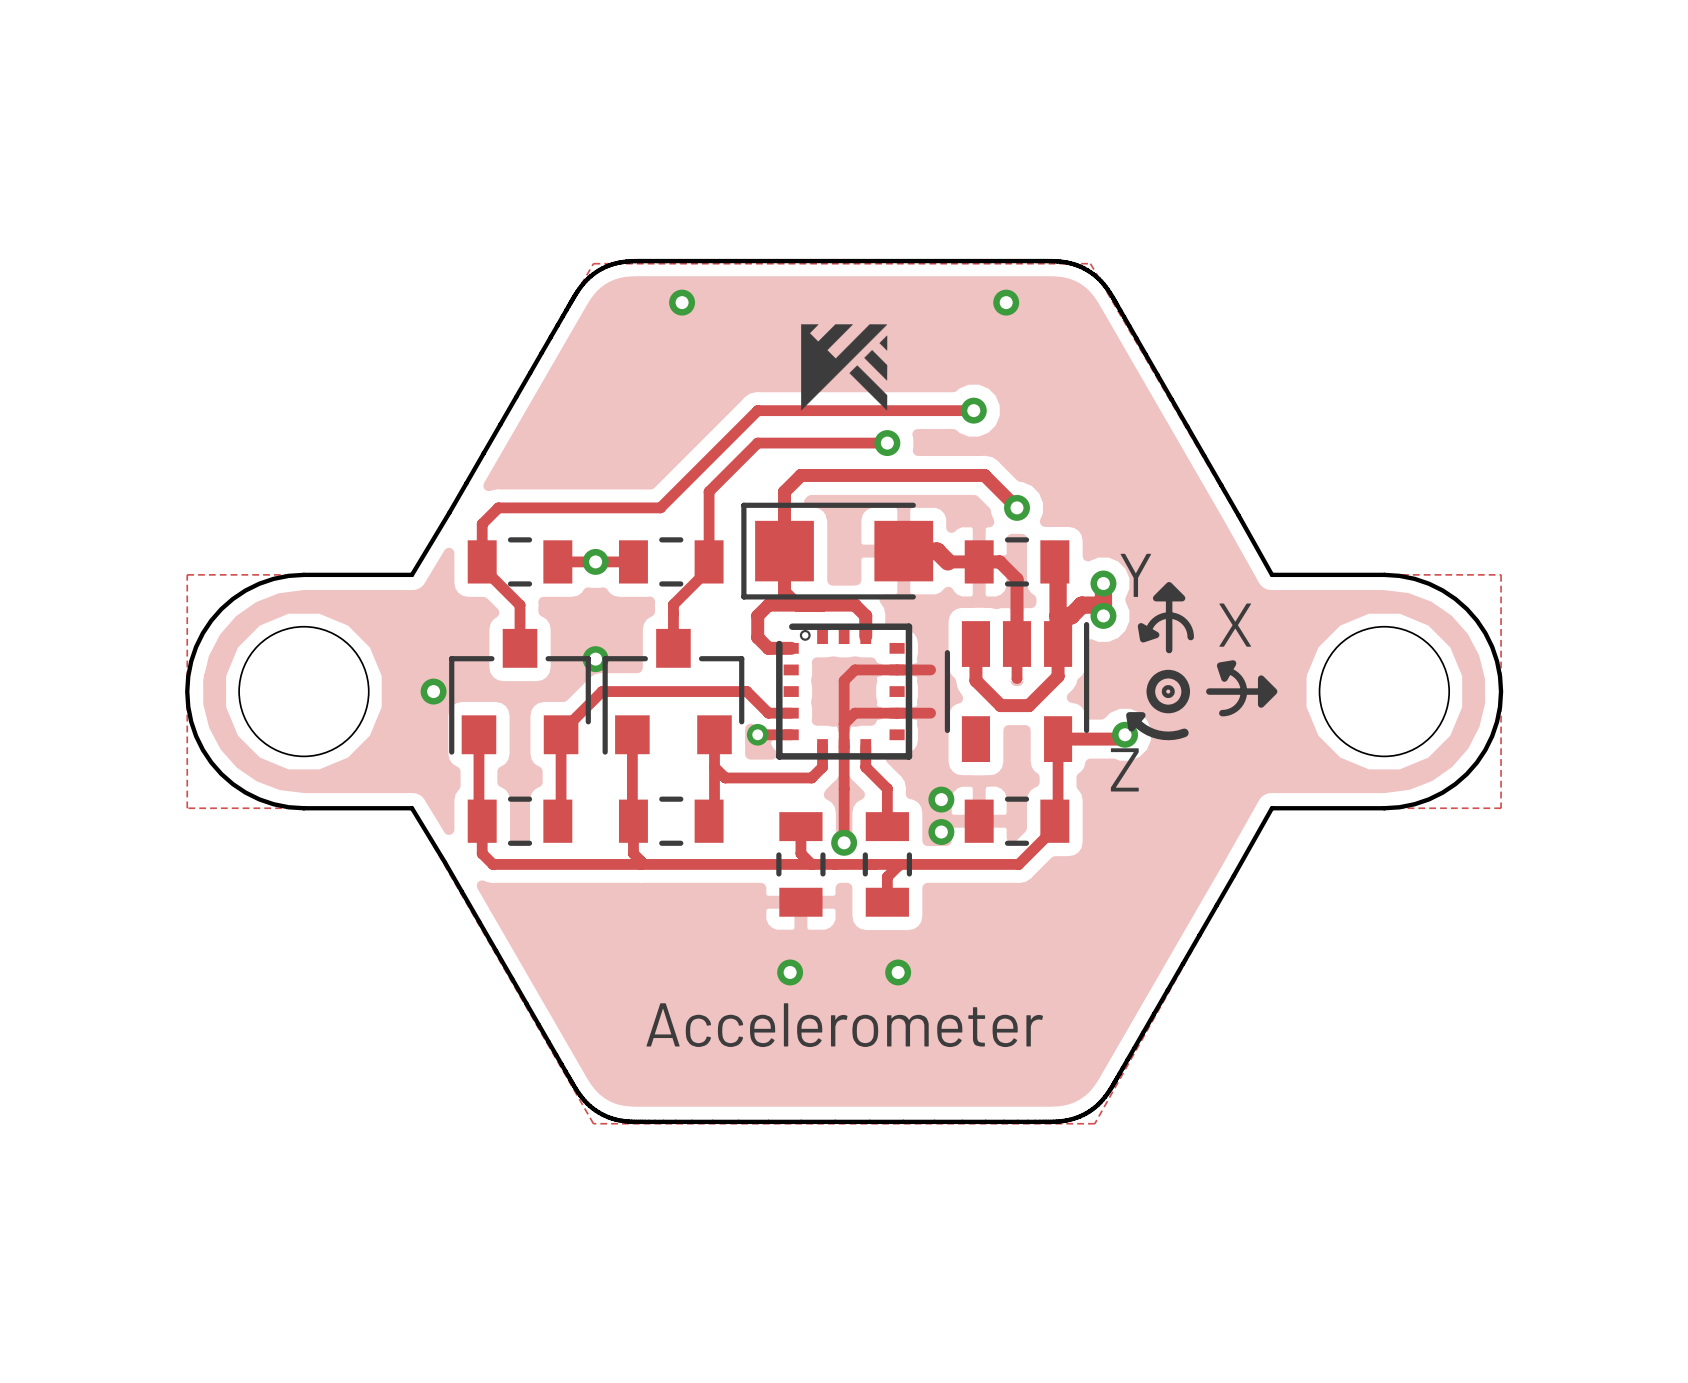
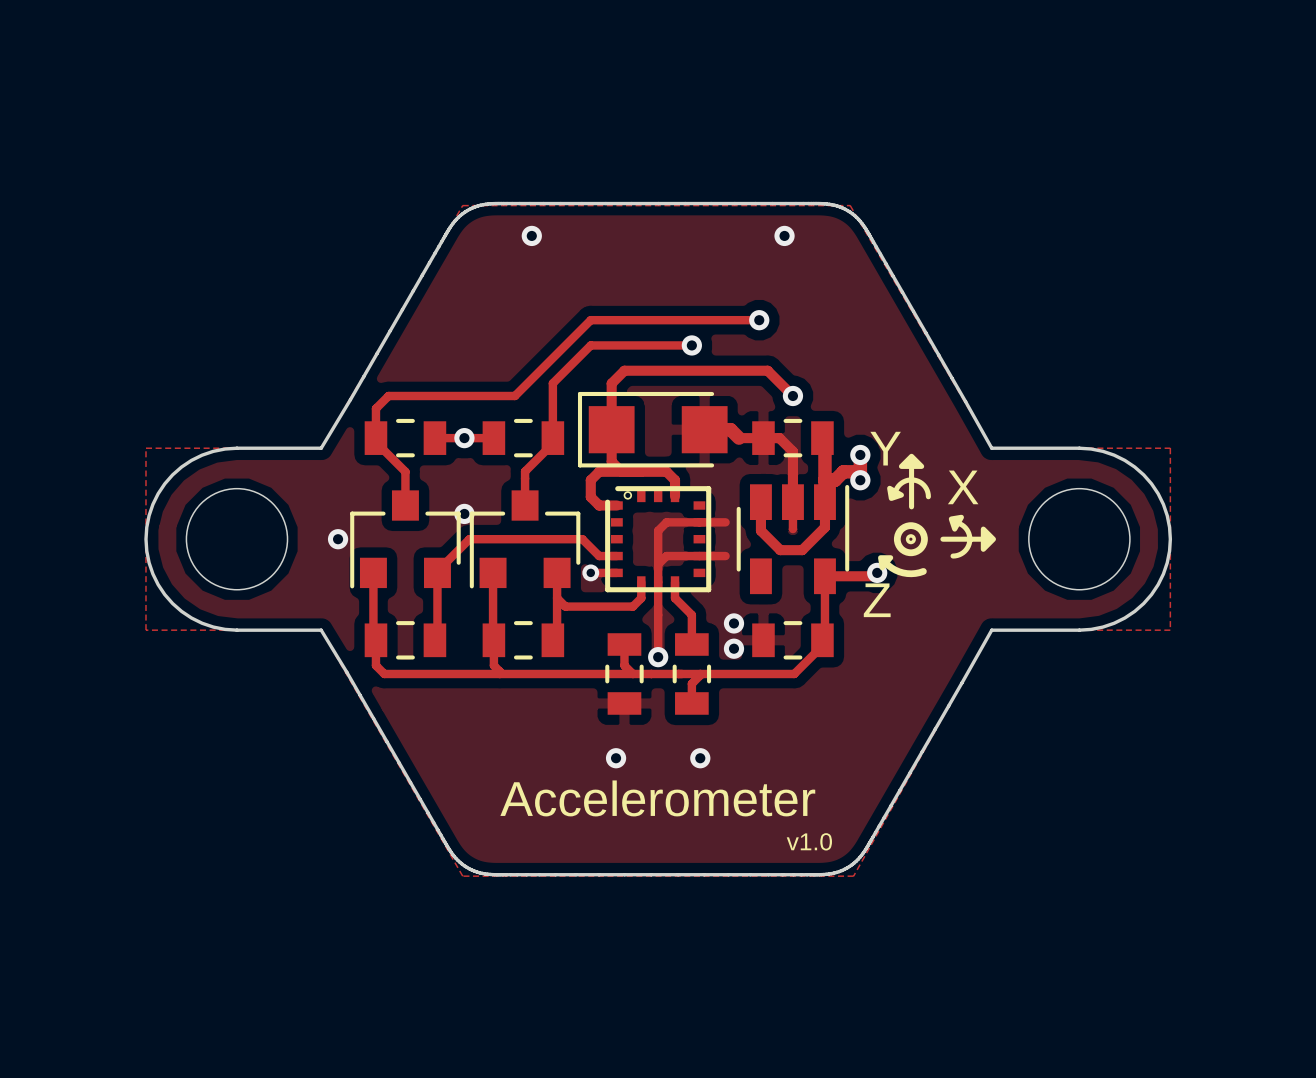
drawing: [801, 324, 888, 411] -> none
text: none -> v1.0 (809, 841)

